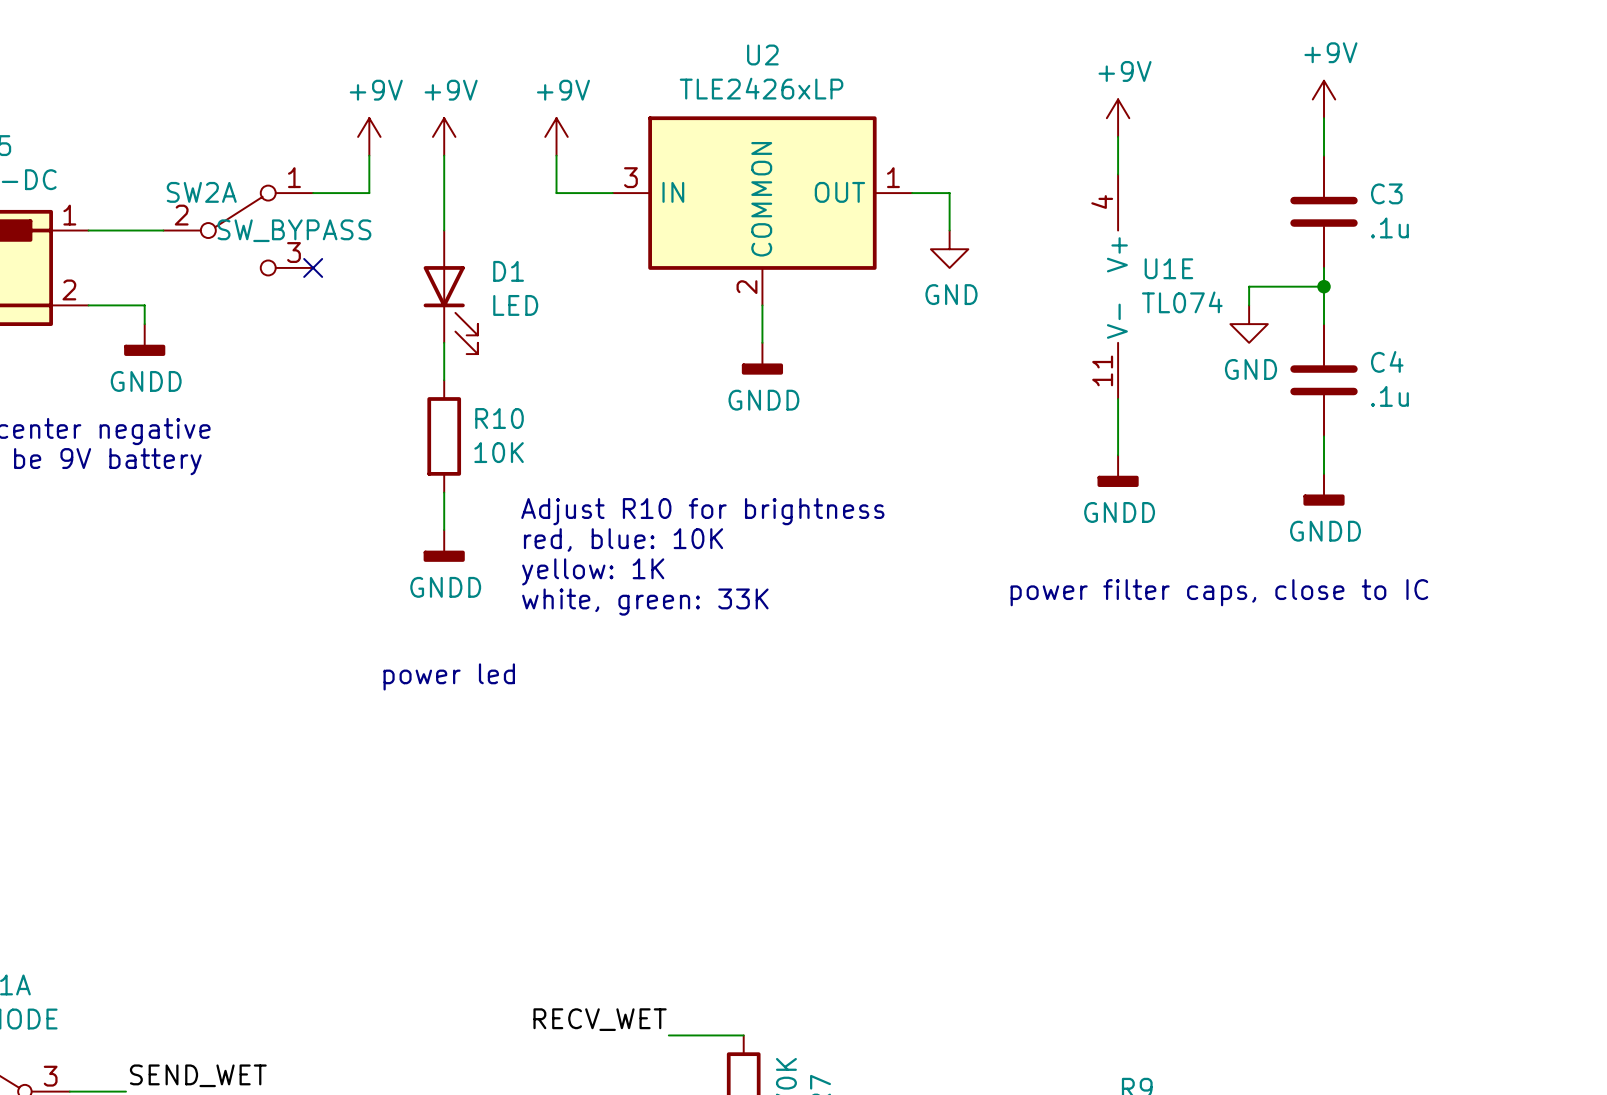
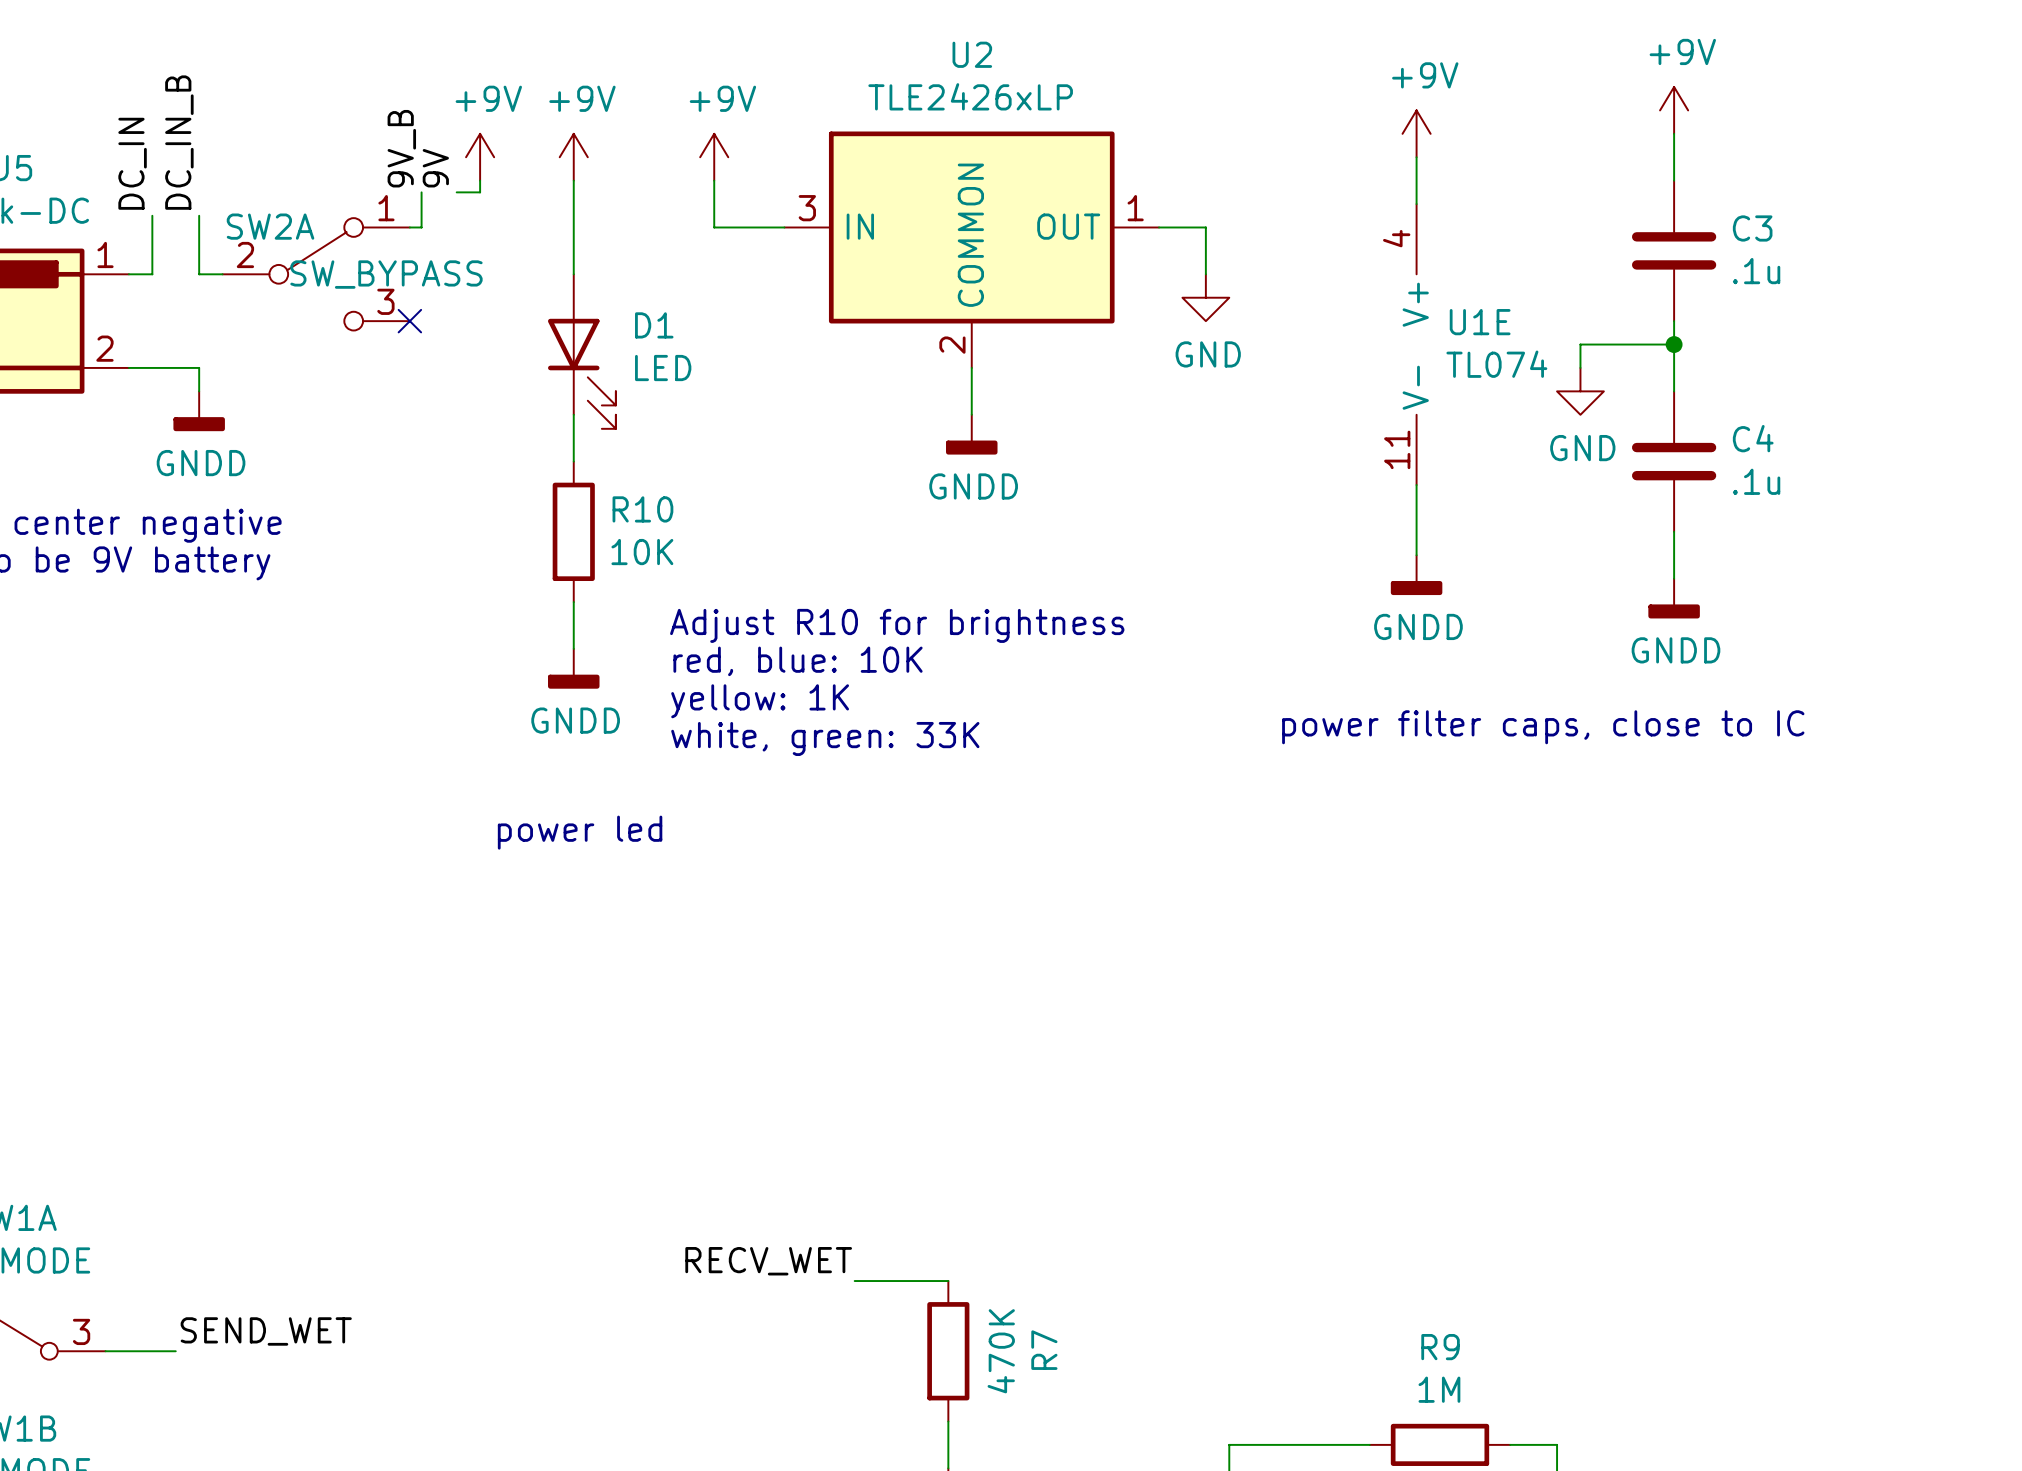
label: none -> DC_IN_B (179, 142)
label: none -> 9V_B (401, 148)
label: none -> DC_IN (132, 163)
label: none -> 9V (435, 168)
wire: none -> (421, 192) (421, 227)
wire: (369, 165) (369, 193) (322, 193) -> (480, 192) (456, 192)
wire: none -> (199, 215) (199, 274)
wire: (107, 230) (144, 230) -> (152, 274) (152, 215)

